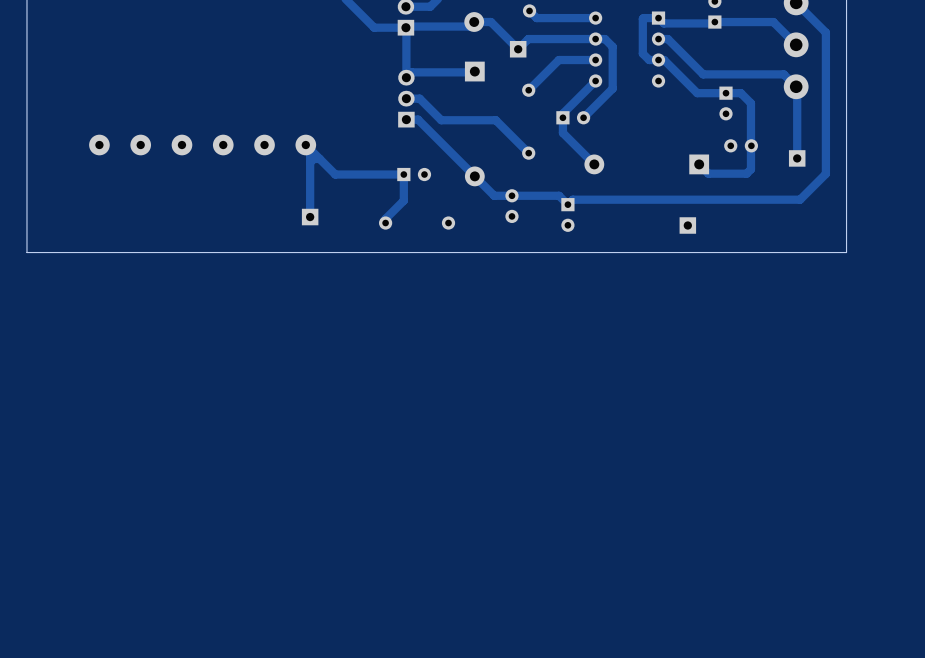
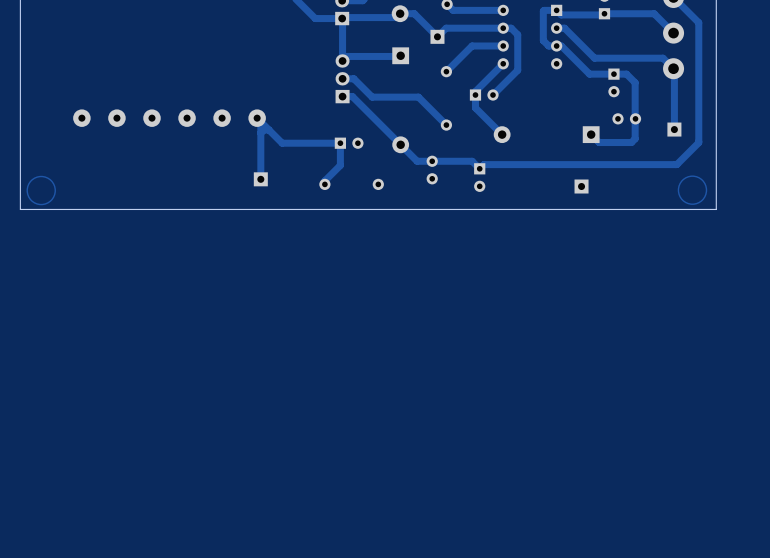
drawing: none -> [26, 175, 56, 206]
drawing: none -> [677, 175, 708, 205]

